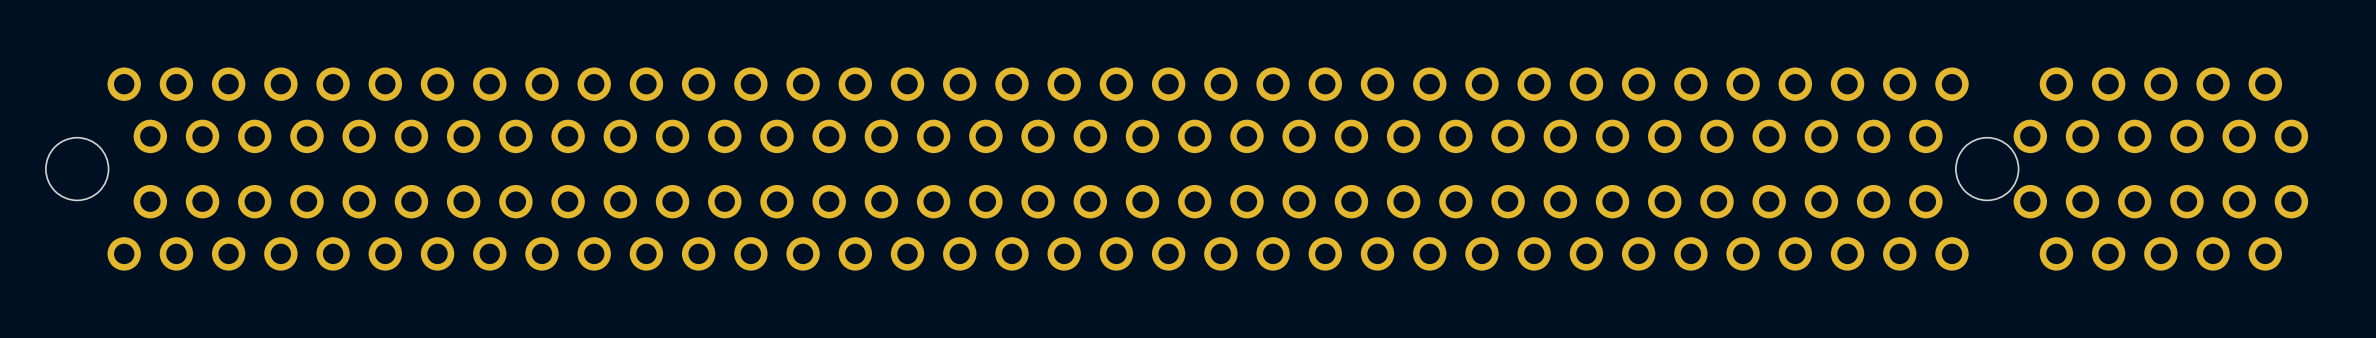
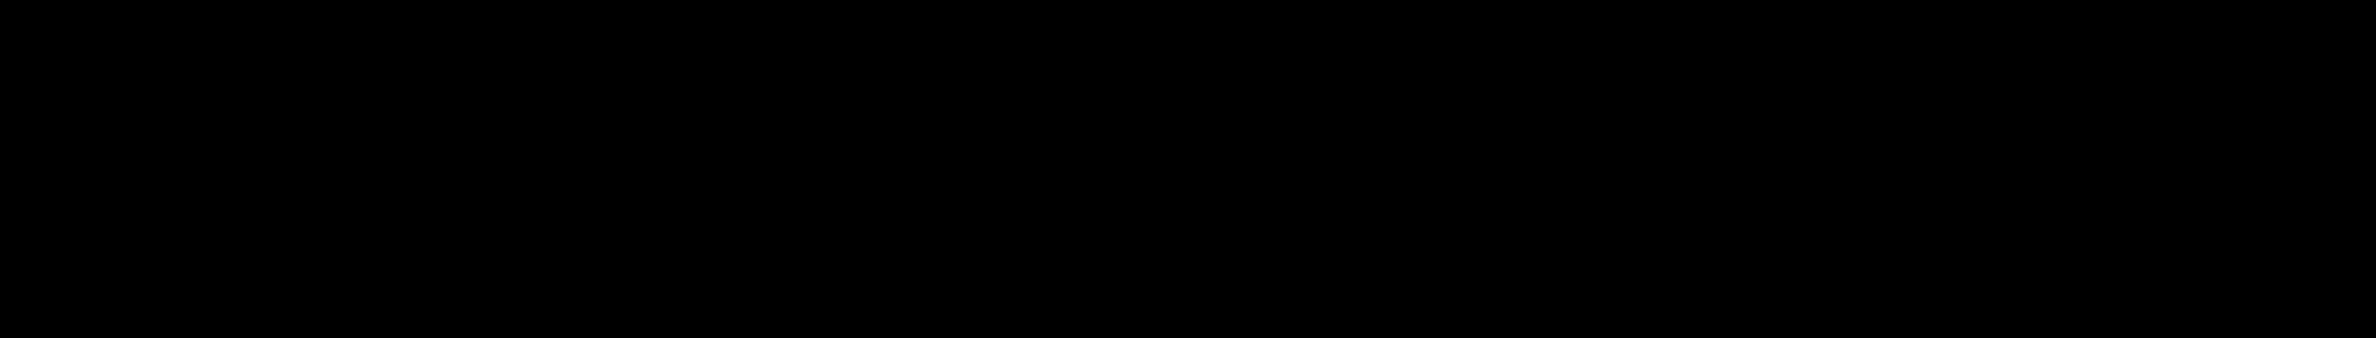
part: (1177, 169) -> none

